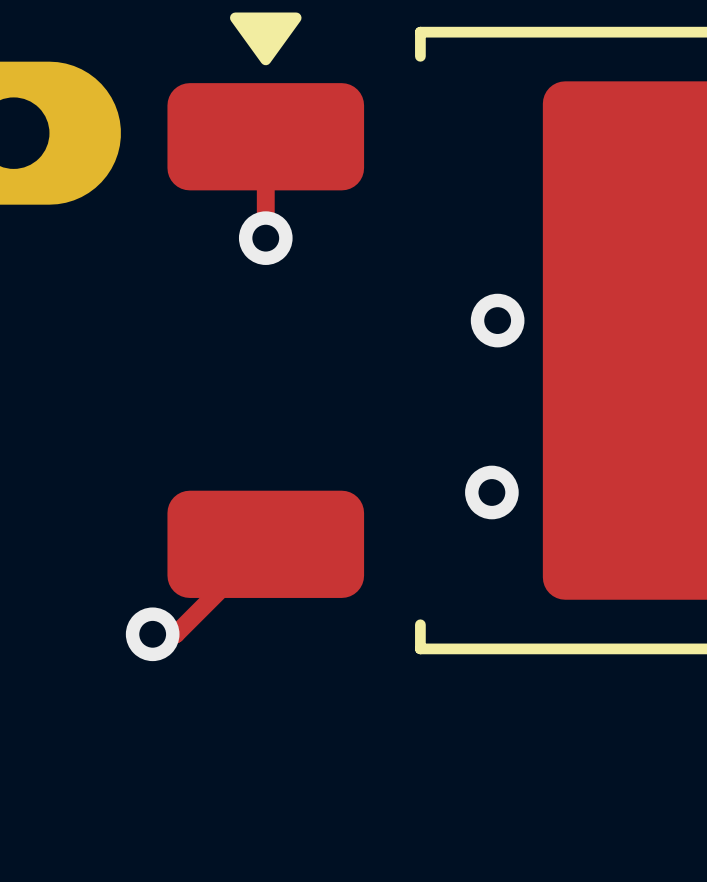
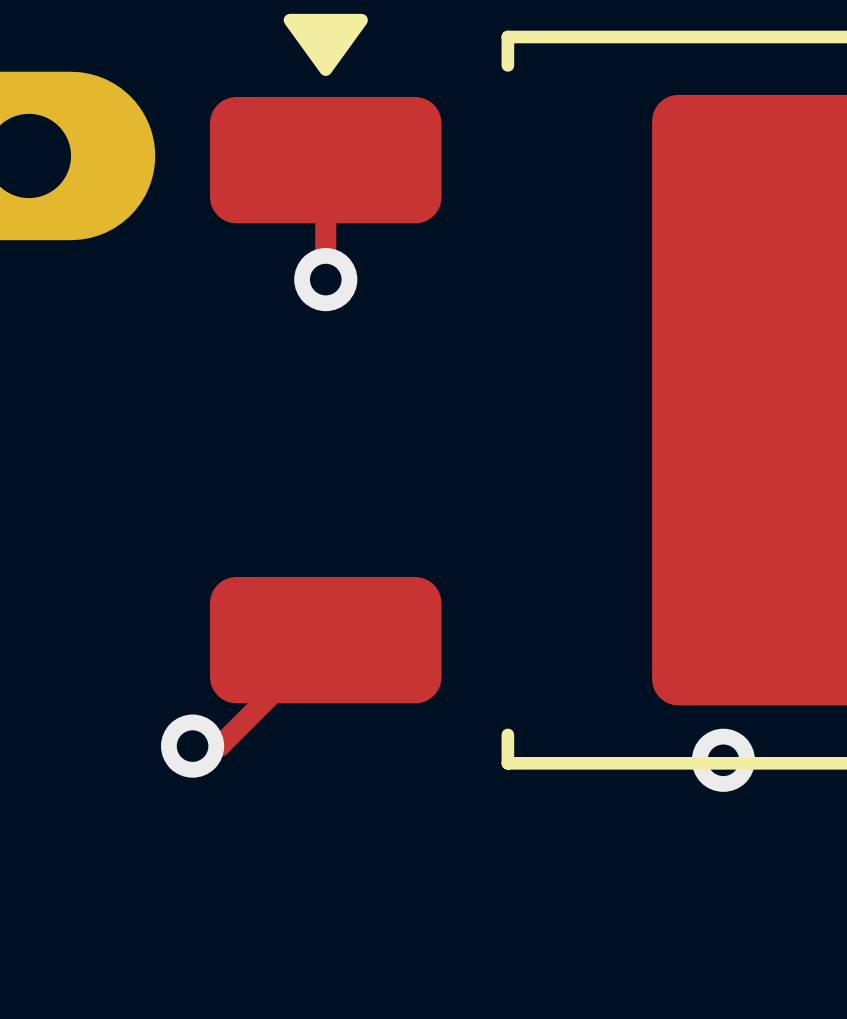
via: (497, 320) -> none
via: (491, 492) -> none
via: none -> (723, 760)

